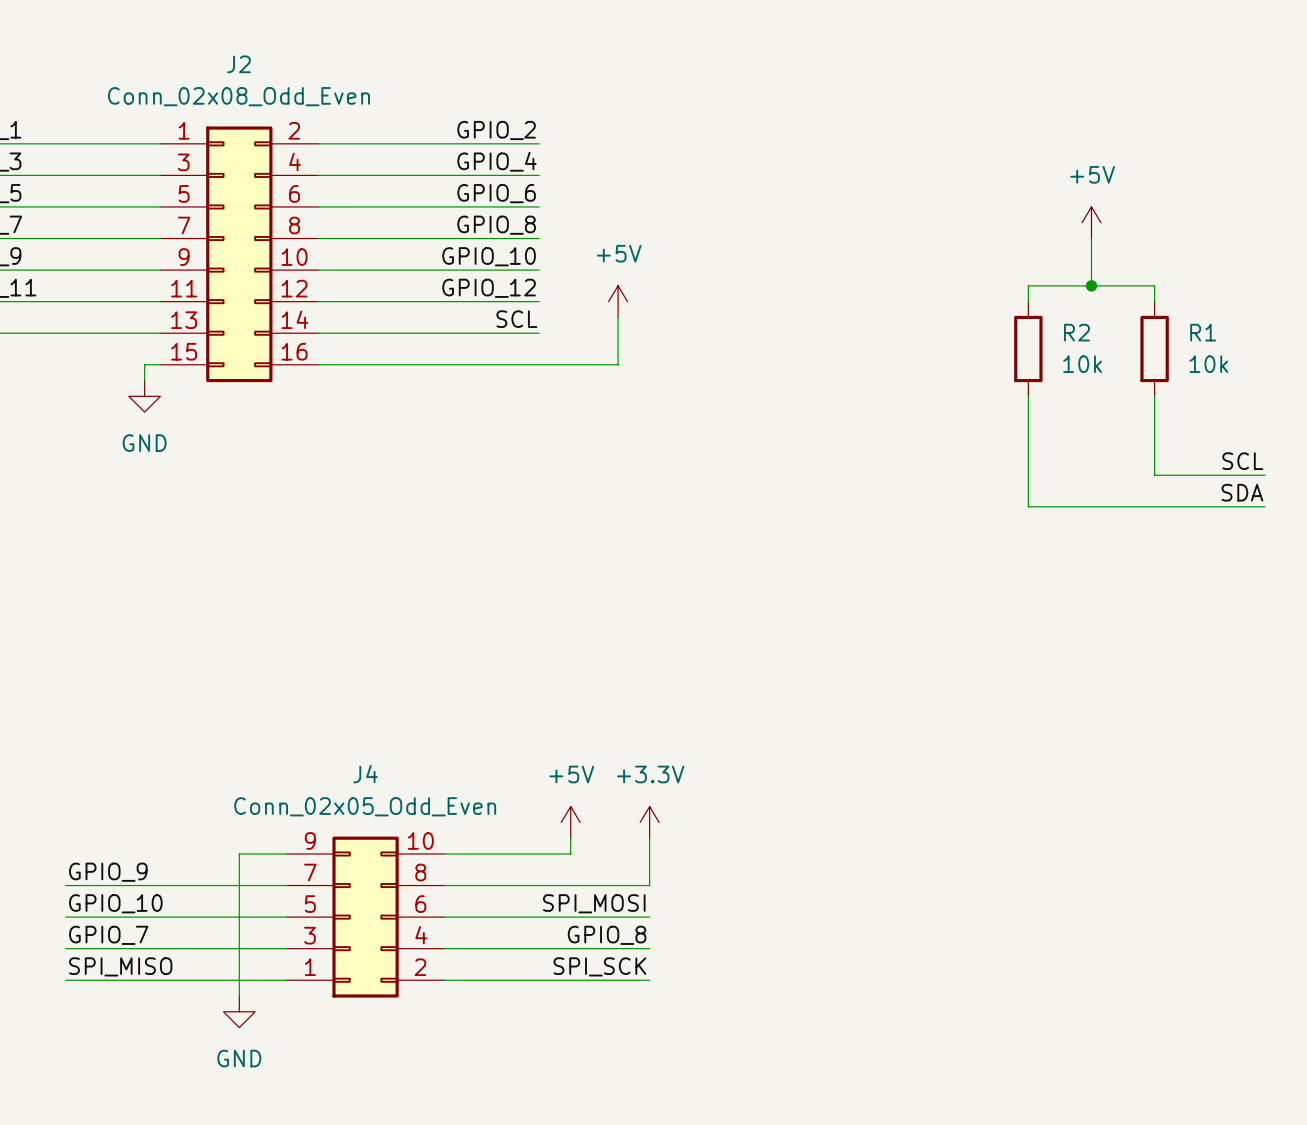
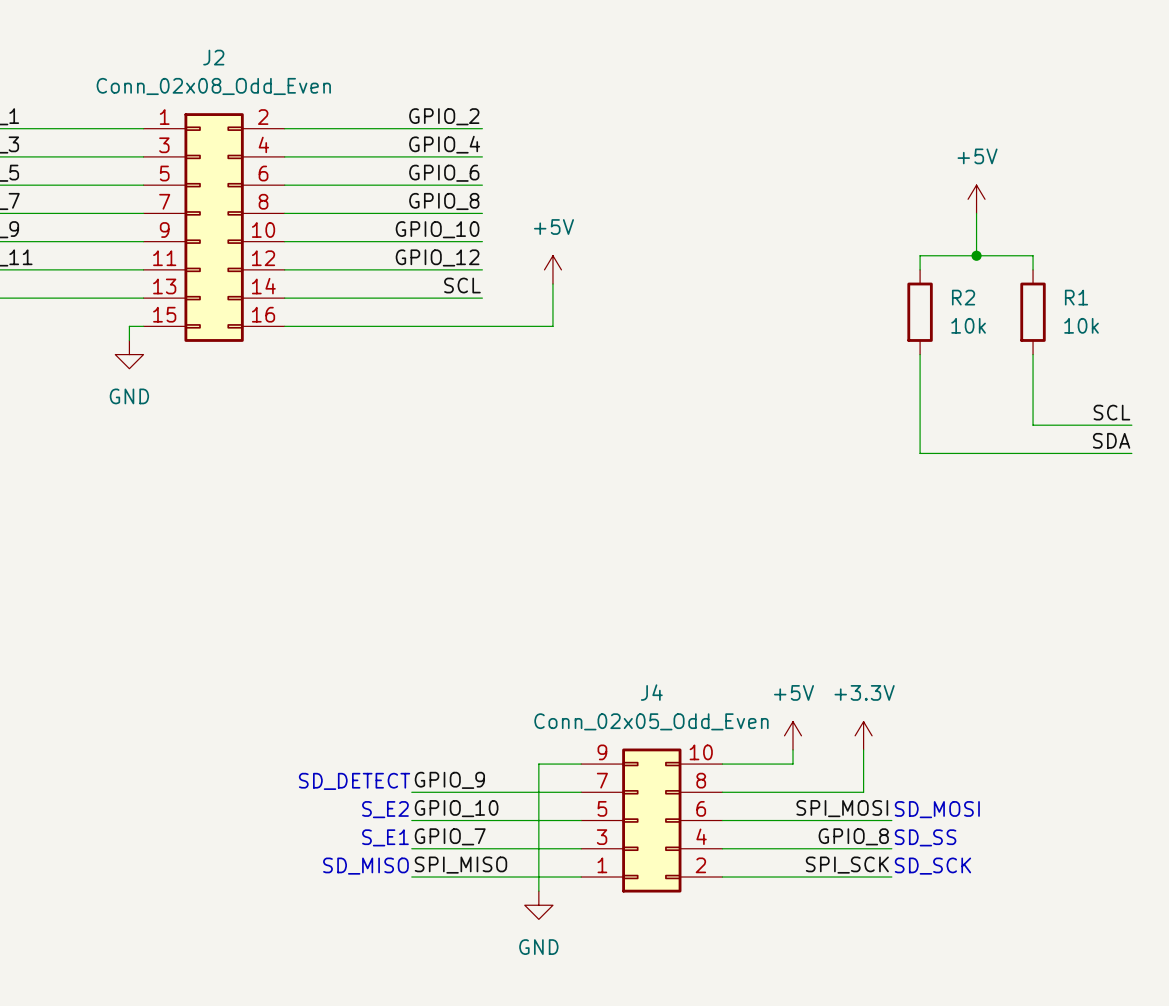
power symbol: +5V (570, 822) -> none
power symbol: +3.3V (649, 822) -> none
power symbol: none -> +5V (793, 735)
power symbol: none -> +3.3V (863, 735)
wire: (570, 838) (570, 853) (444, 853) -> none
wire: (649, 838) (649, 885) -> none
wire: none -> (793, 749) (793, 764) (722, 764)
wire: none -> (863, 749) (863, 792) (722, 792)
wire: (286, 853) (239, 853) (239, 996) -> none
wire: none -> (581, 764) (538, 764) (538, 891)
label: GPIO_9 (108, 872) -> none
label: none -> GPIO_9 (449, 780)
text: none -> SD_DETECT (354, 781)
wire: (65, 885) (286, 885) -> none
wire: (444, 885) (460, 885) -> none
label: GPIO_10 (115, 903) -> none
label: none -> GPIO_10 (456, 808)
label: SPI_MOSI (594, 903) -> none
label: none -> SPI_MOSI (842, 808)
text: none -> S_E2 (385, 809)
text: none -> SD_MOSI (937, 809)
wire: (65, 917) (286, 917) -> none
J4 position: (365, 917) -> (651, 820)
wire: (444, 917) (460, 917) -> none
wire: none -> (722, 820) (891, 820)
label: GPIO_7 (108, 935) -> none
label: none -> GPIO_7 (450, 836)
label: GPIO_8 (607, 935) -> none
label: none -> GPIO_8 (853, 836)
text: none -> S_E1 (385, 837)
text: none -> SD_SS (925, 837)
wire: (65, 948) (286, 948) -> none
wire: (444, 948) (460, 948) -> none
wire: none -> (722, 848) (891, 848)
label: SPI_MISO (120, 966) -> none
label: SPI_SCK (599, 966) -> SPI_MISO (460, 865)
label: none -> SPI_SCK (847, 865)
text: none -> SD_MISO (365, 866)
text: none -> SD_SCK (932, 866)
wire: (65, 980) (286, 980) -> none
wire: (444, 980) (460, 980) -> none
wire: none -> (722, 877) (891, 877)
power symbol: GND (239, 1011) -> none
power symbol: none -> GND (538, 905)

